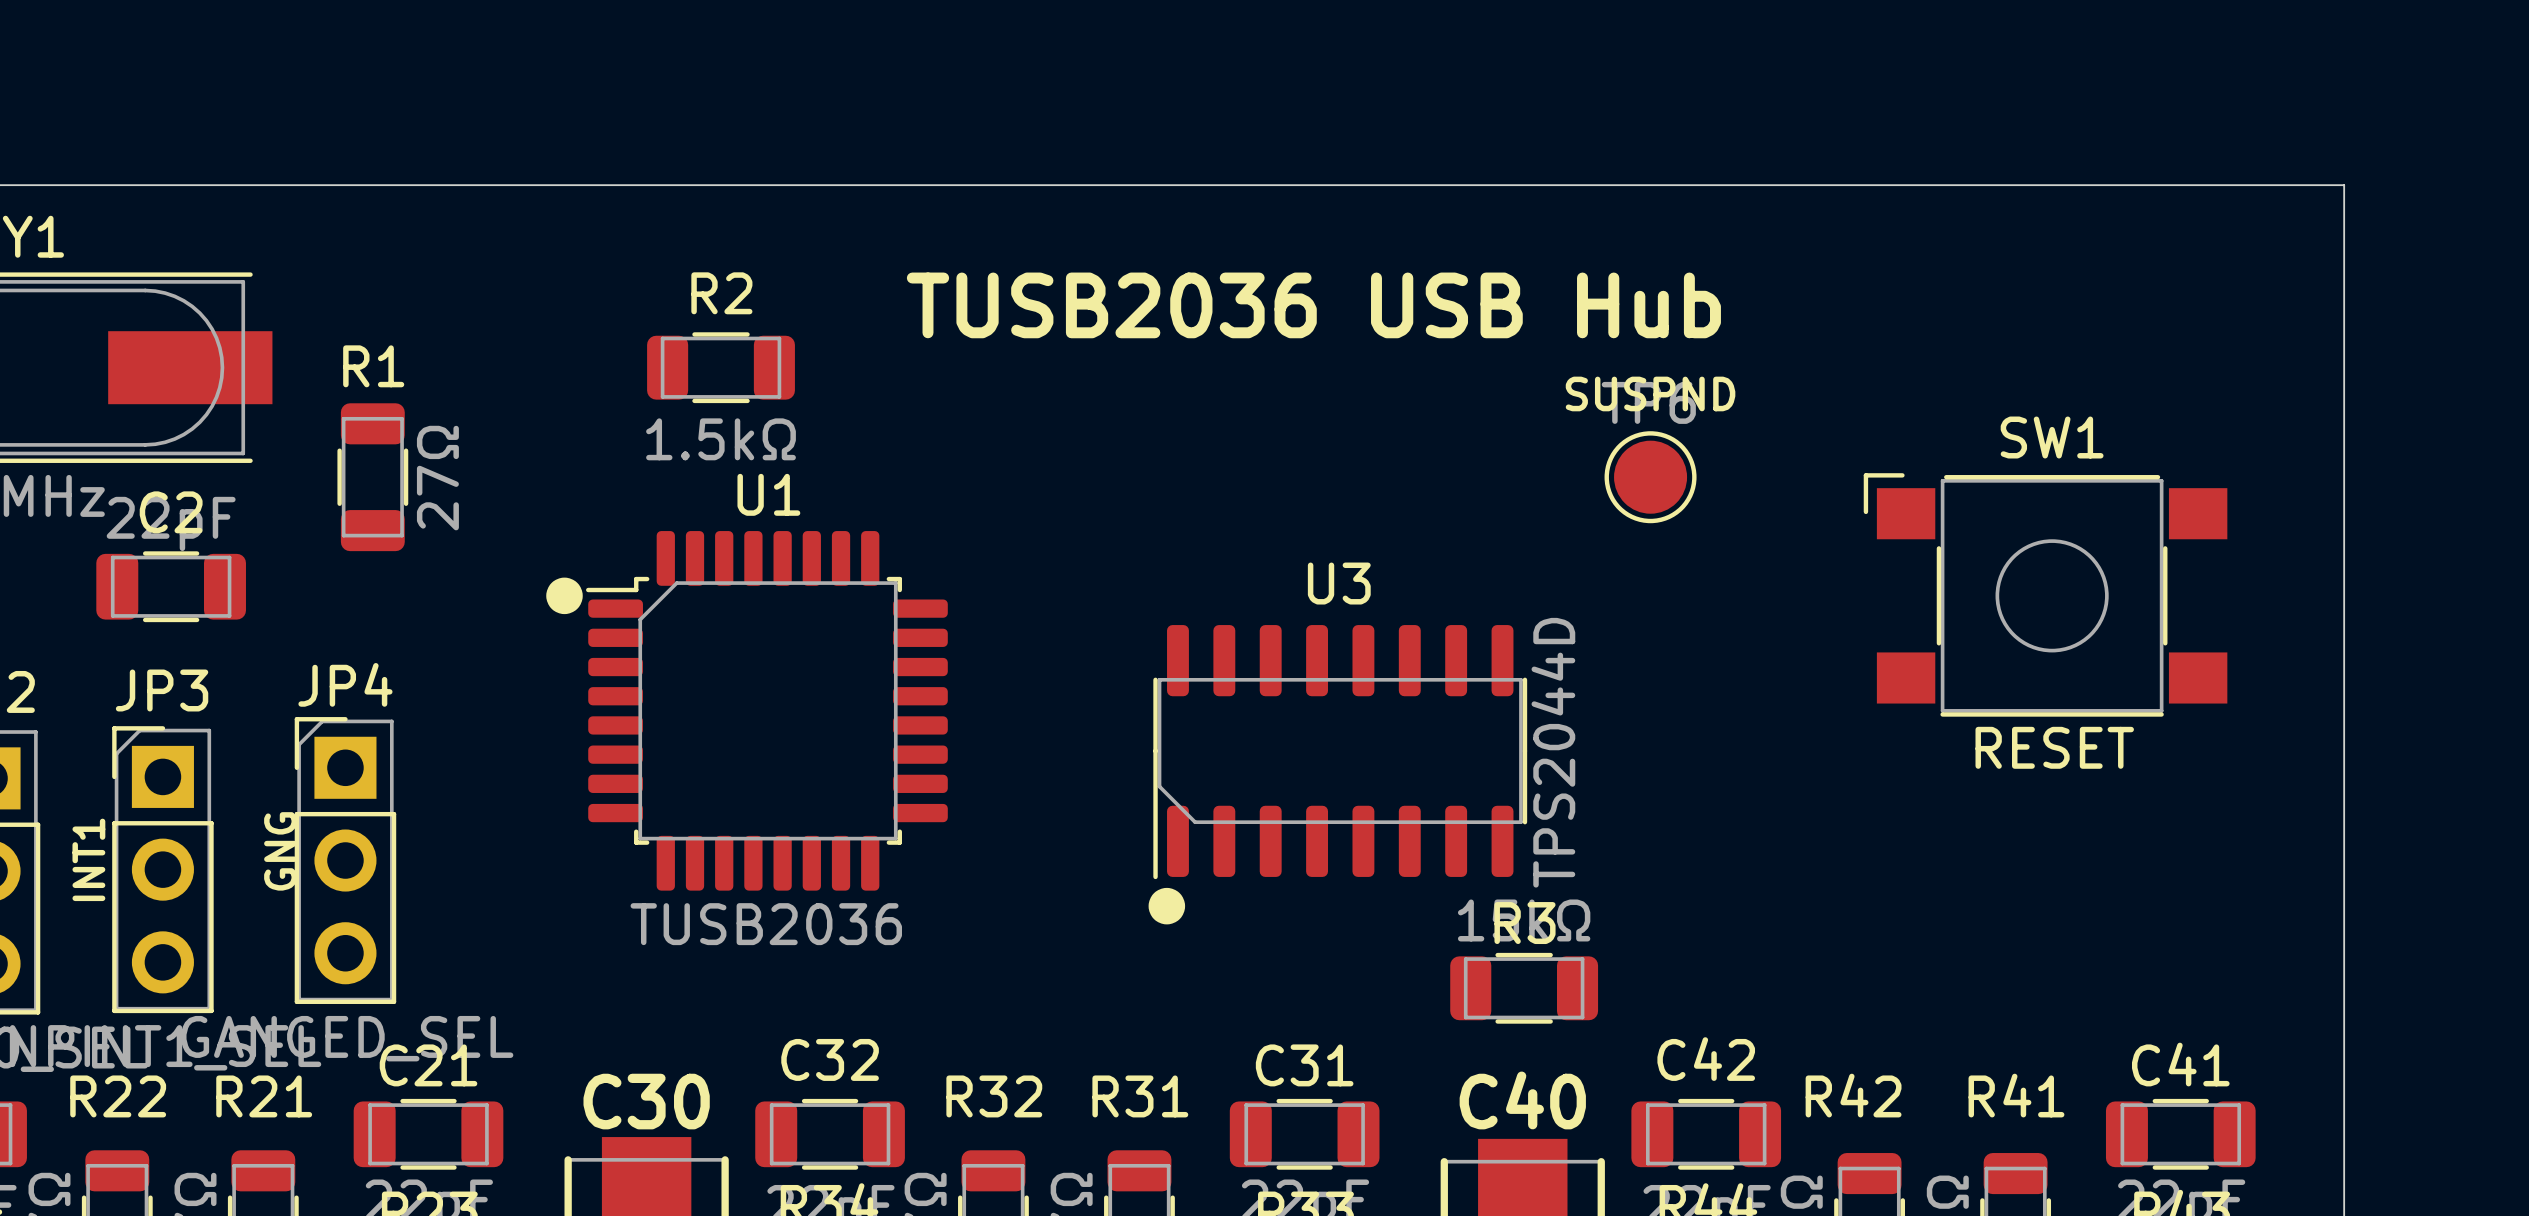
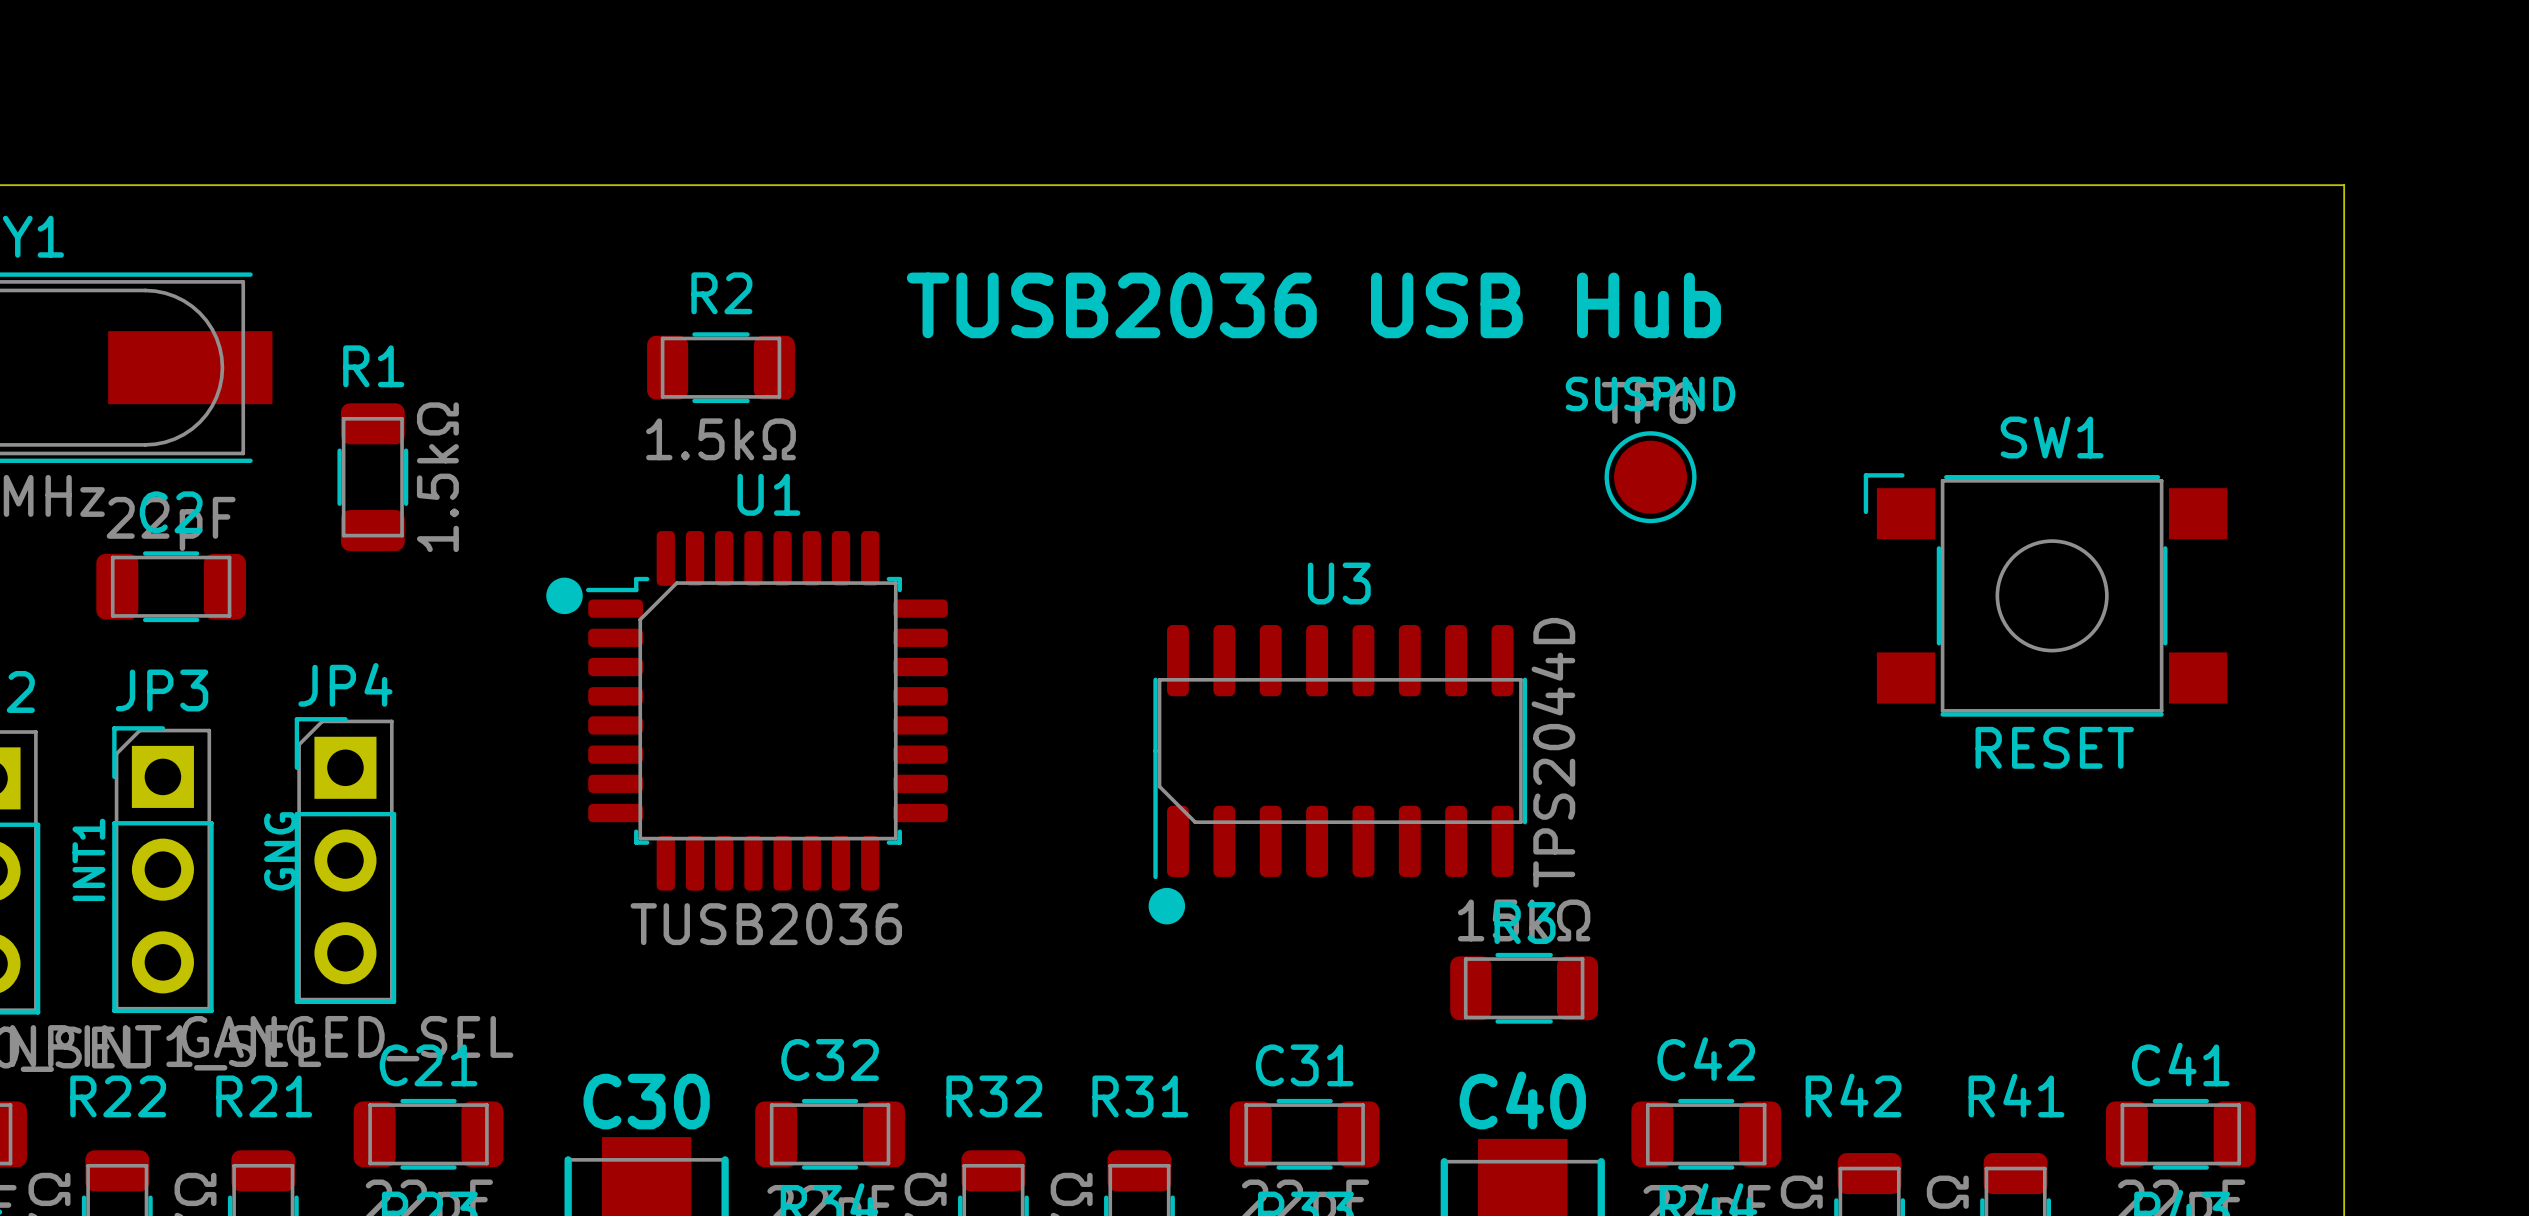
R1 value: 27Ω (437, 478) -> 1.5kΩ (437, 477)

